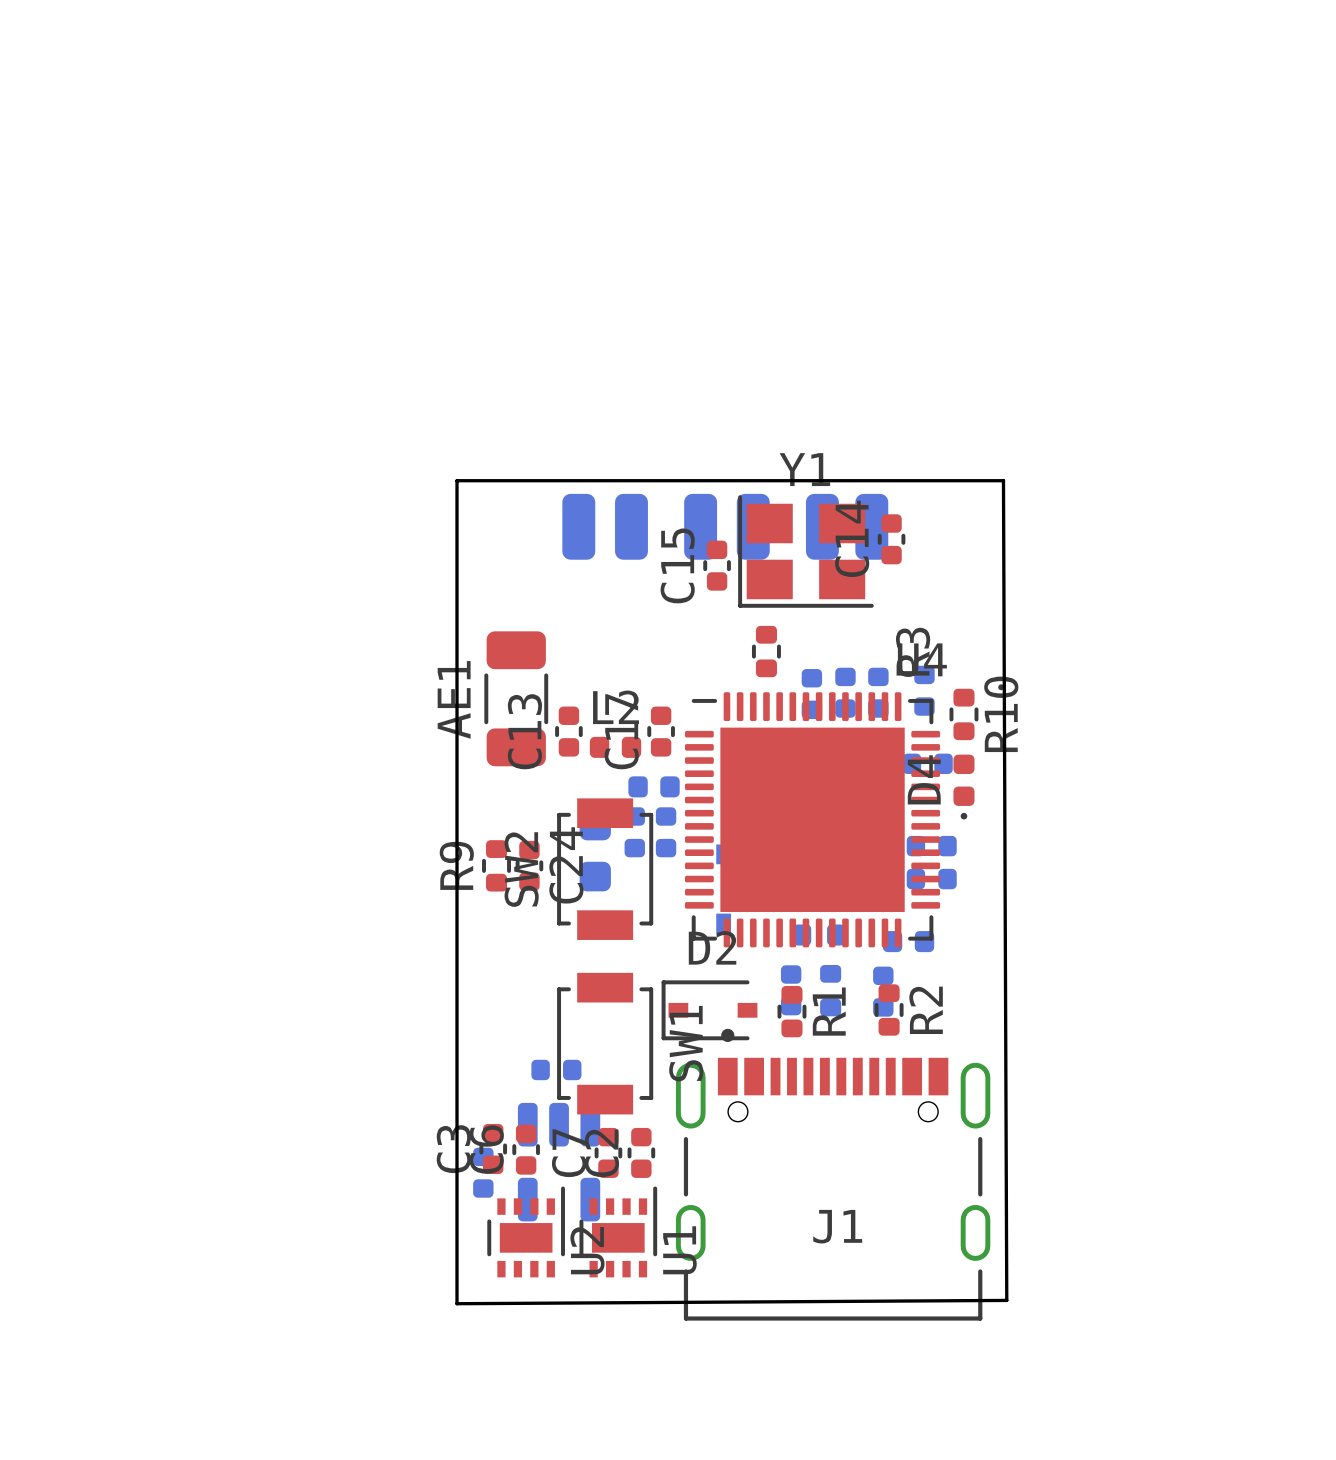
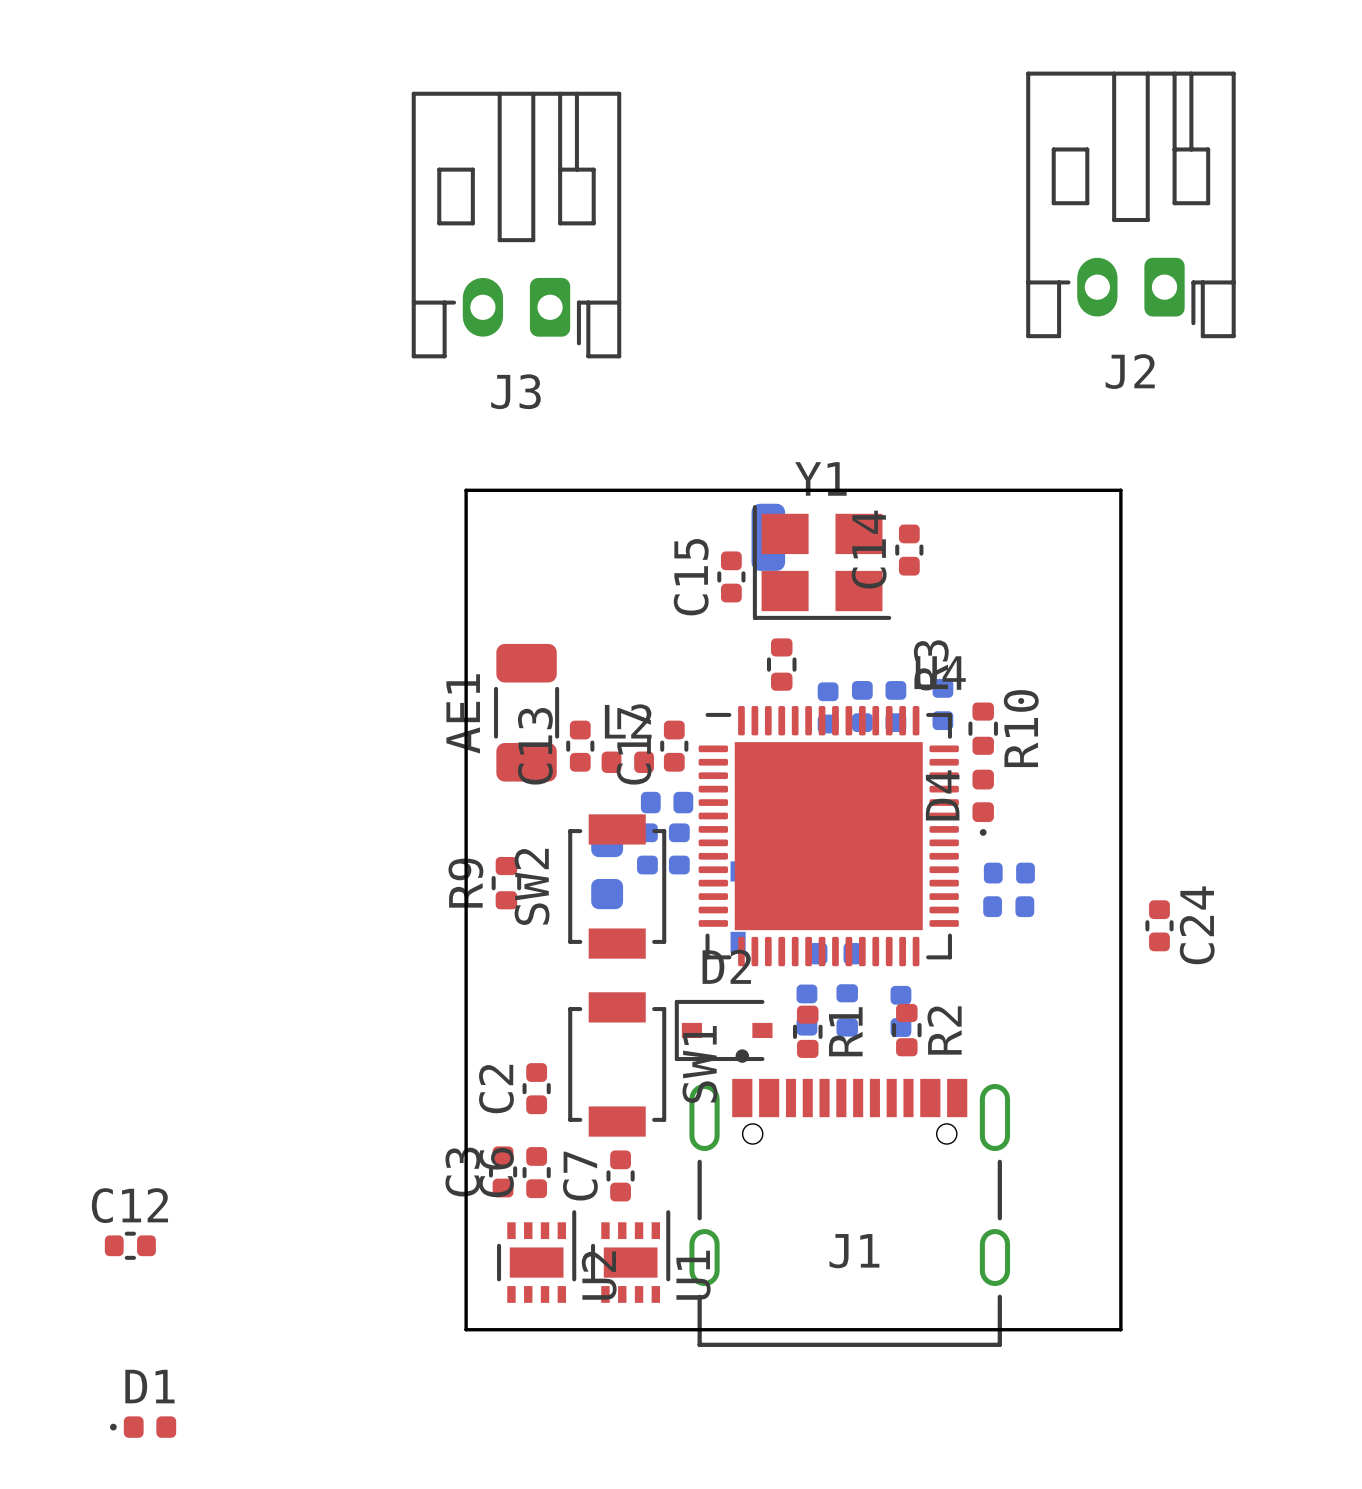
J2: none -> (1130, 204)
J3: none -> (516, 225)
board edge: (1003, 480) (1006, 1300) (457, 1303) -> (1023, 490) (1120, 490) (1120, 1329) (466, 1329)
part: (578, 526) -> none
part: (631, 526) -> none
part: (700, 526) -> none
part: (822, 526) -> none
part: (871, 526) -> none
part: (927, 763) -> none
part: (931, 846) -> none
part: none -> (1009, 873)
C24 position: (529, 865) -> (1159, 925)
part: (931, 879) -> none
part: none -> (1008, 906)
part: (908, 941) -> none
part: (556, 1069) -> none
C2 position: (641, 1152) -> (536, 1088)
part: (559, 1162) -> none
part: (483, 1172) -> none
C12: none -> (130, 1245)
D1: none -> (143, 1427)

